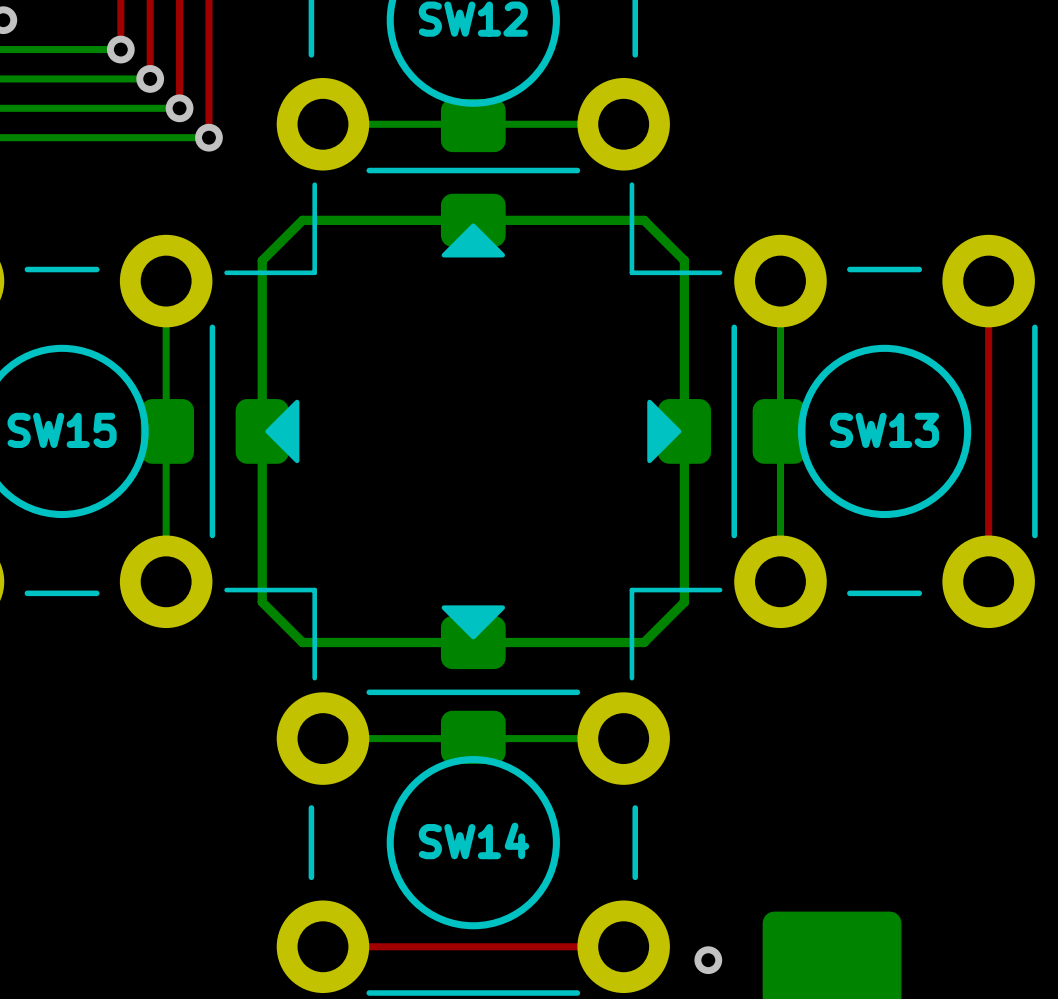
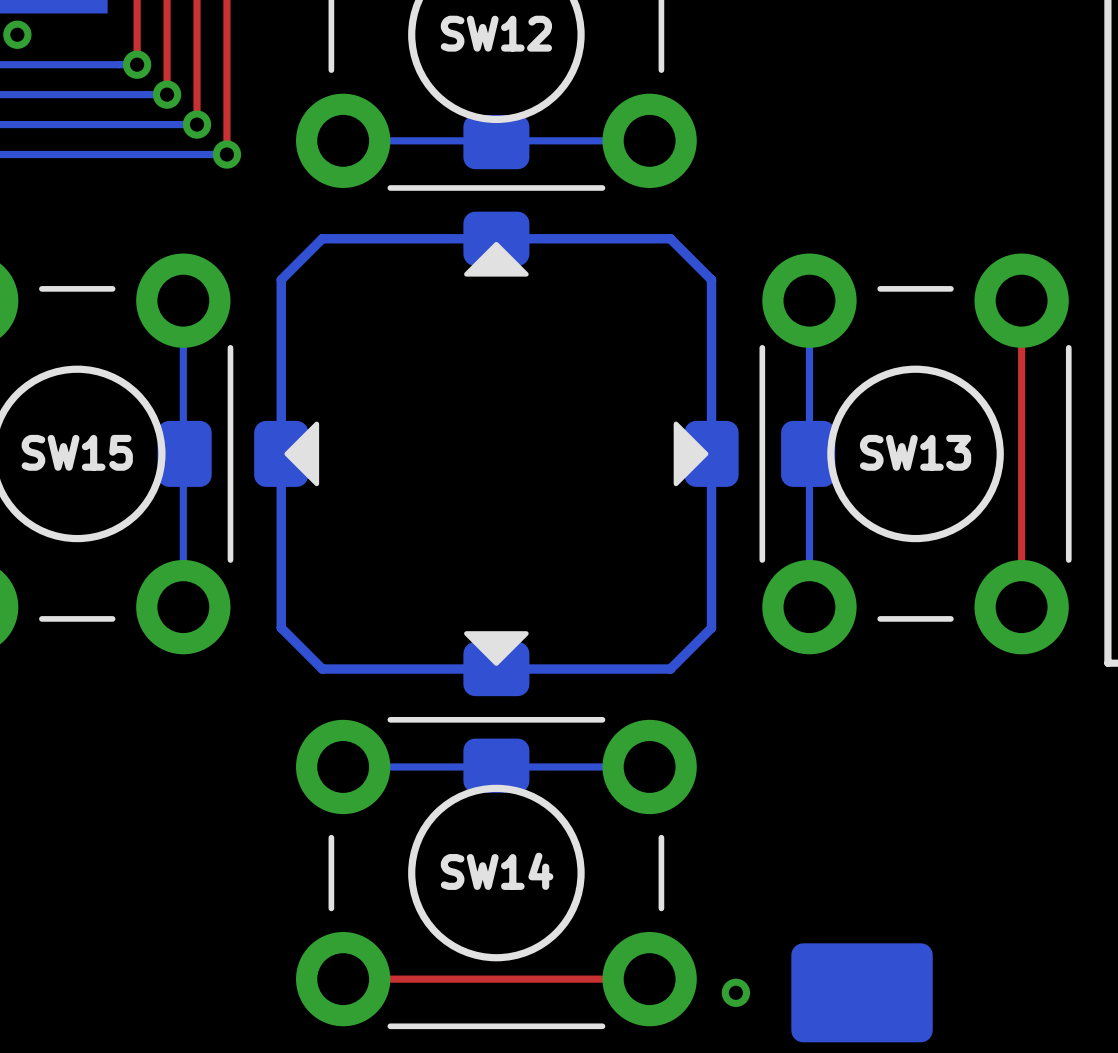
line: (314, 184) (314, 272) (226, 272) -> none
line: (631, 184) (631, 272) (720, 272) -> none
line: (226, 590) (314, 590) (314, 678) -> none
line: (720, 590) (631, 590) (631, 678) -> none

